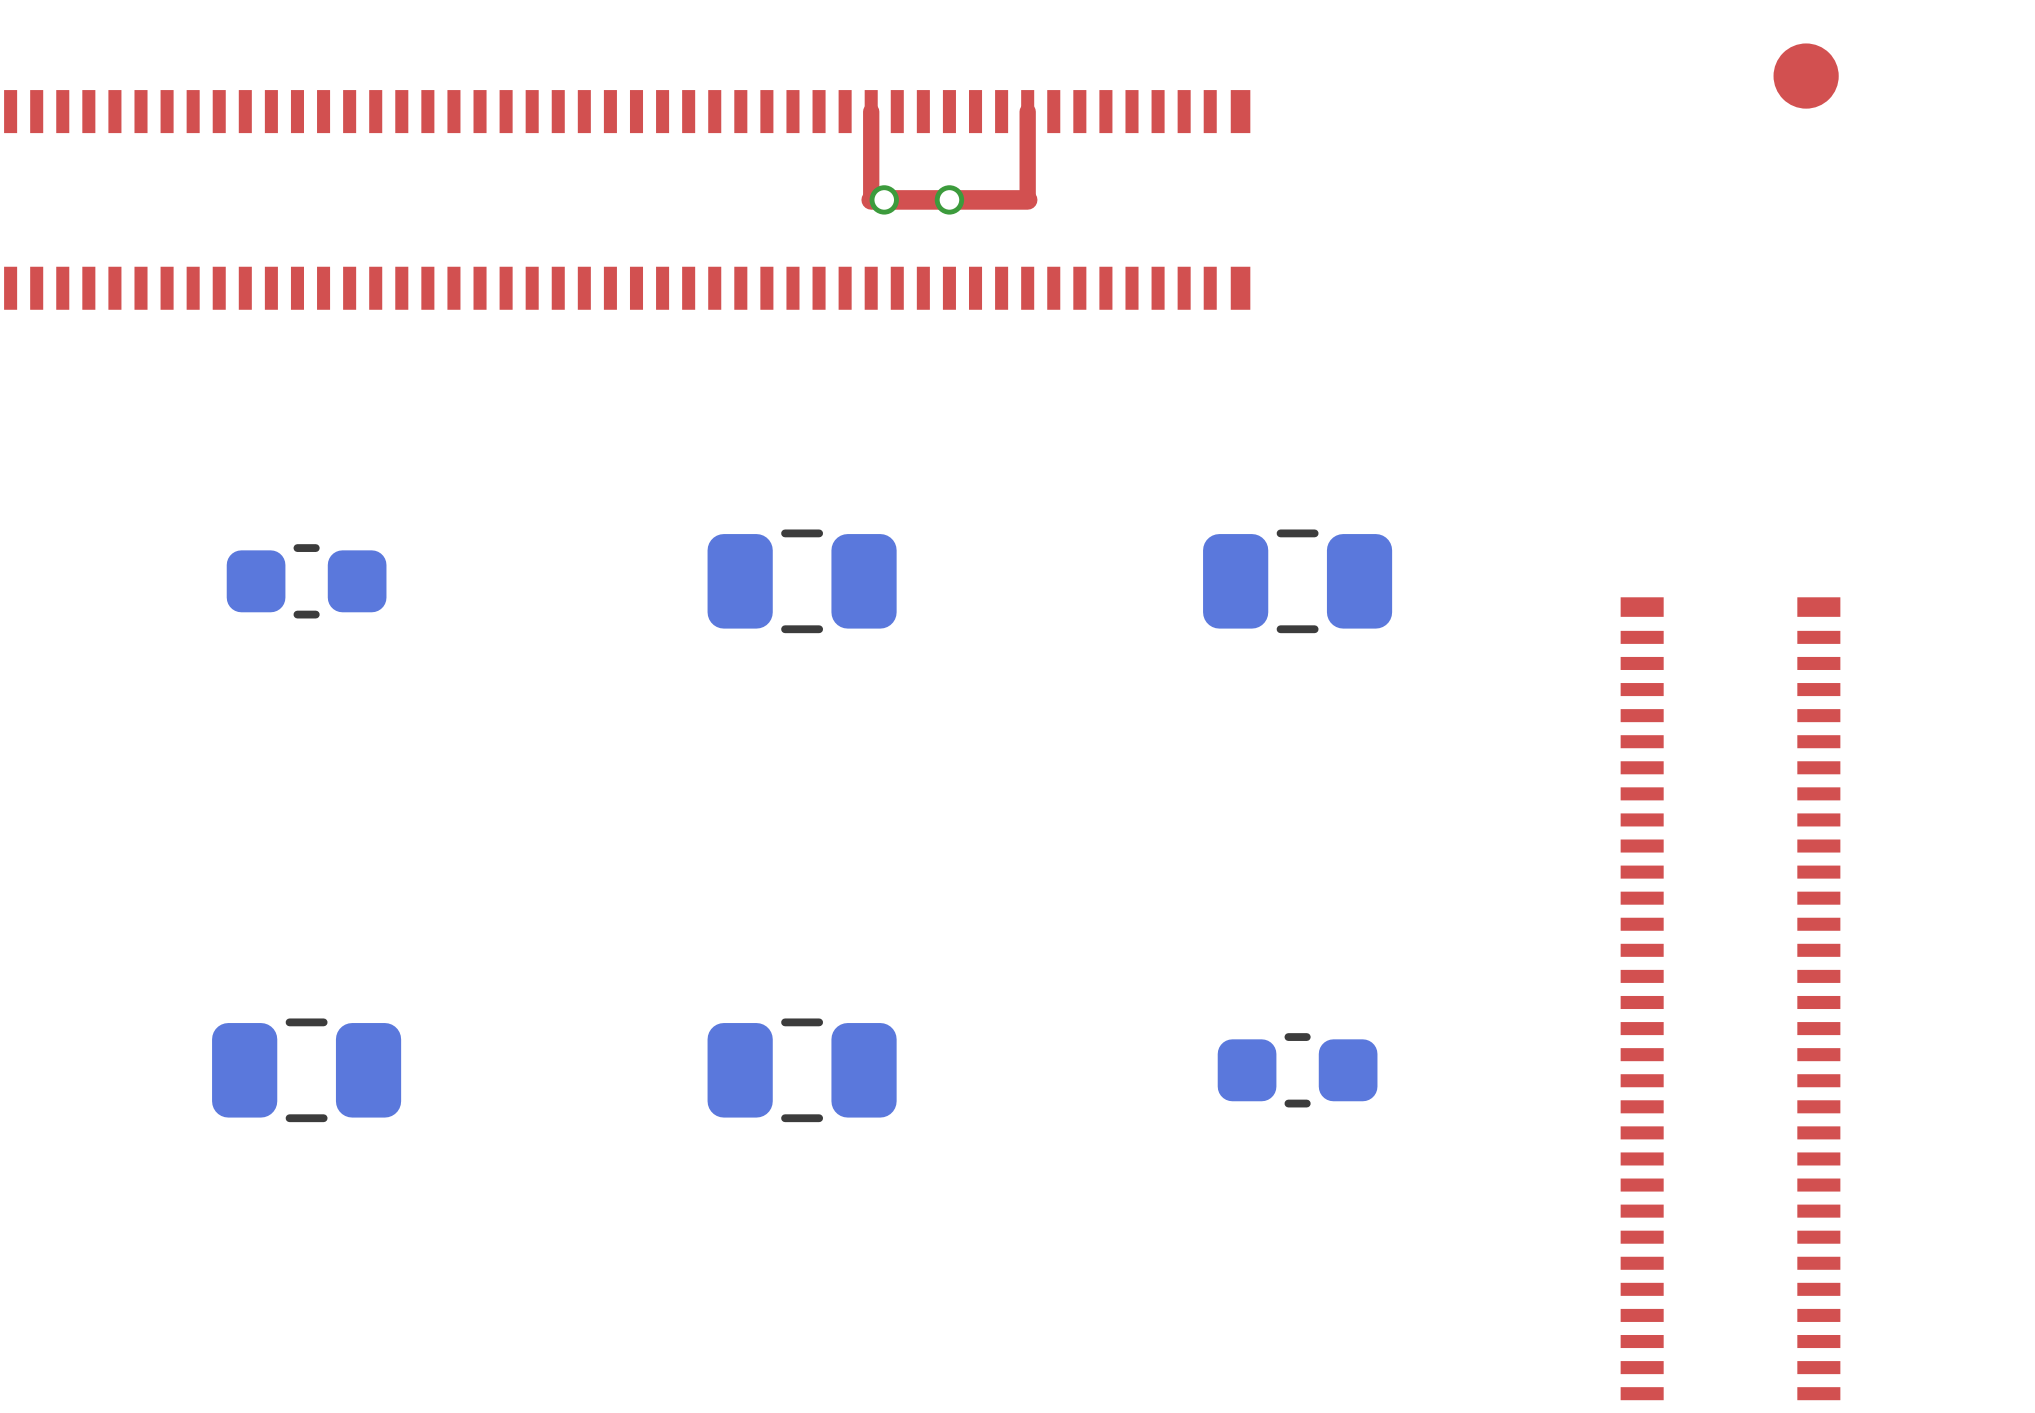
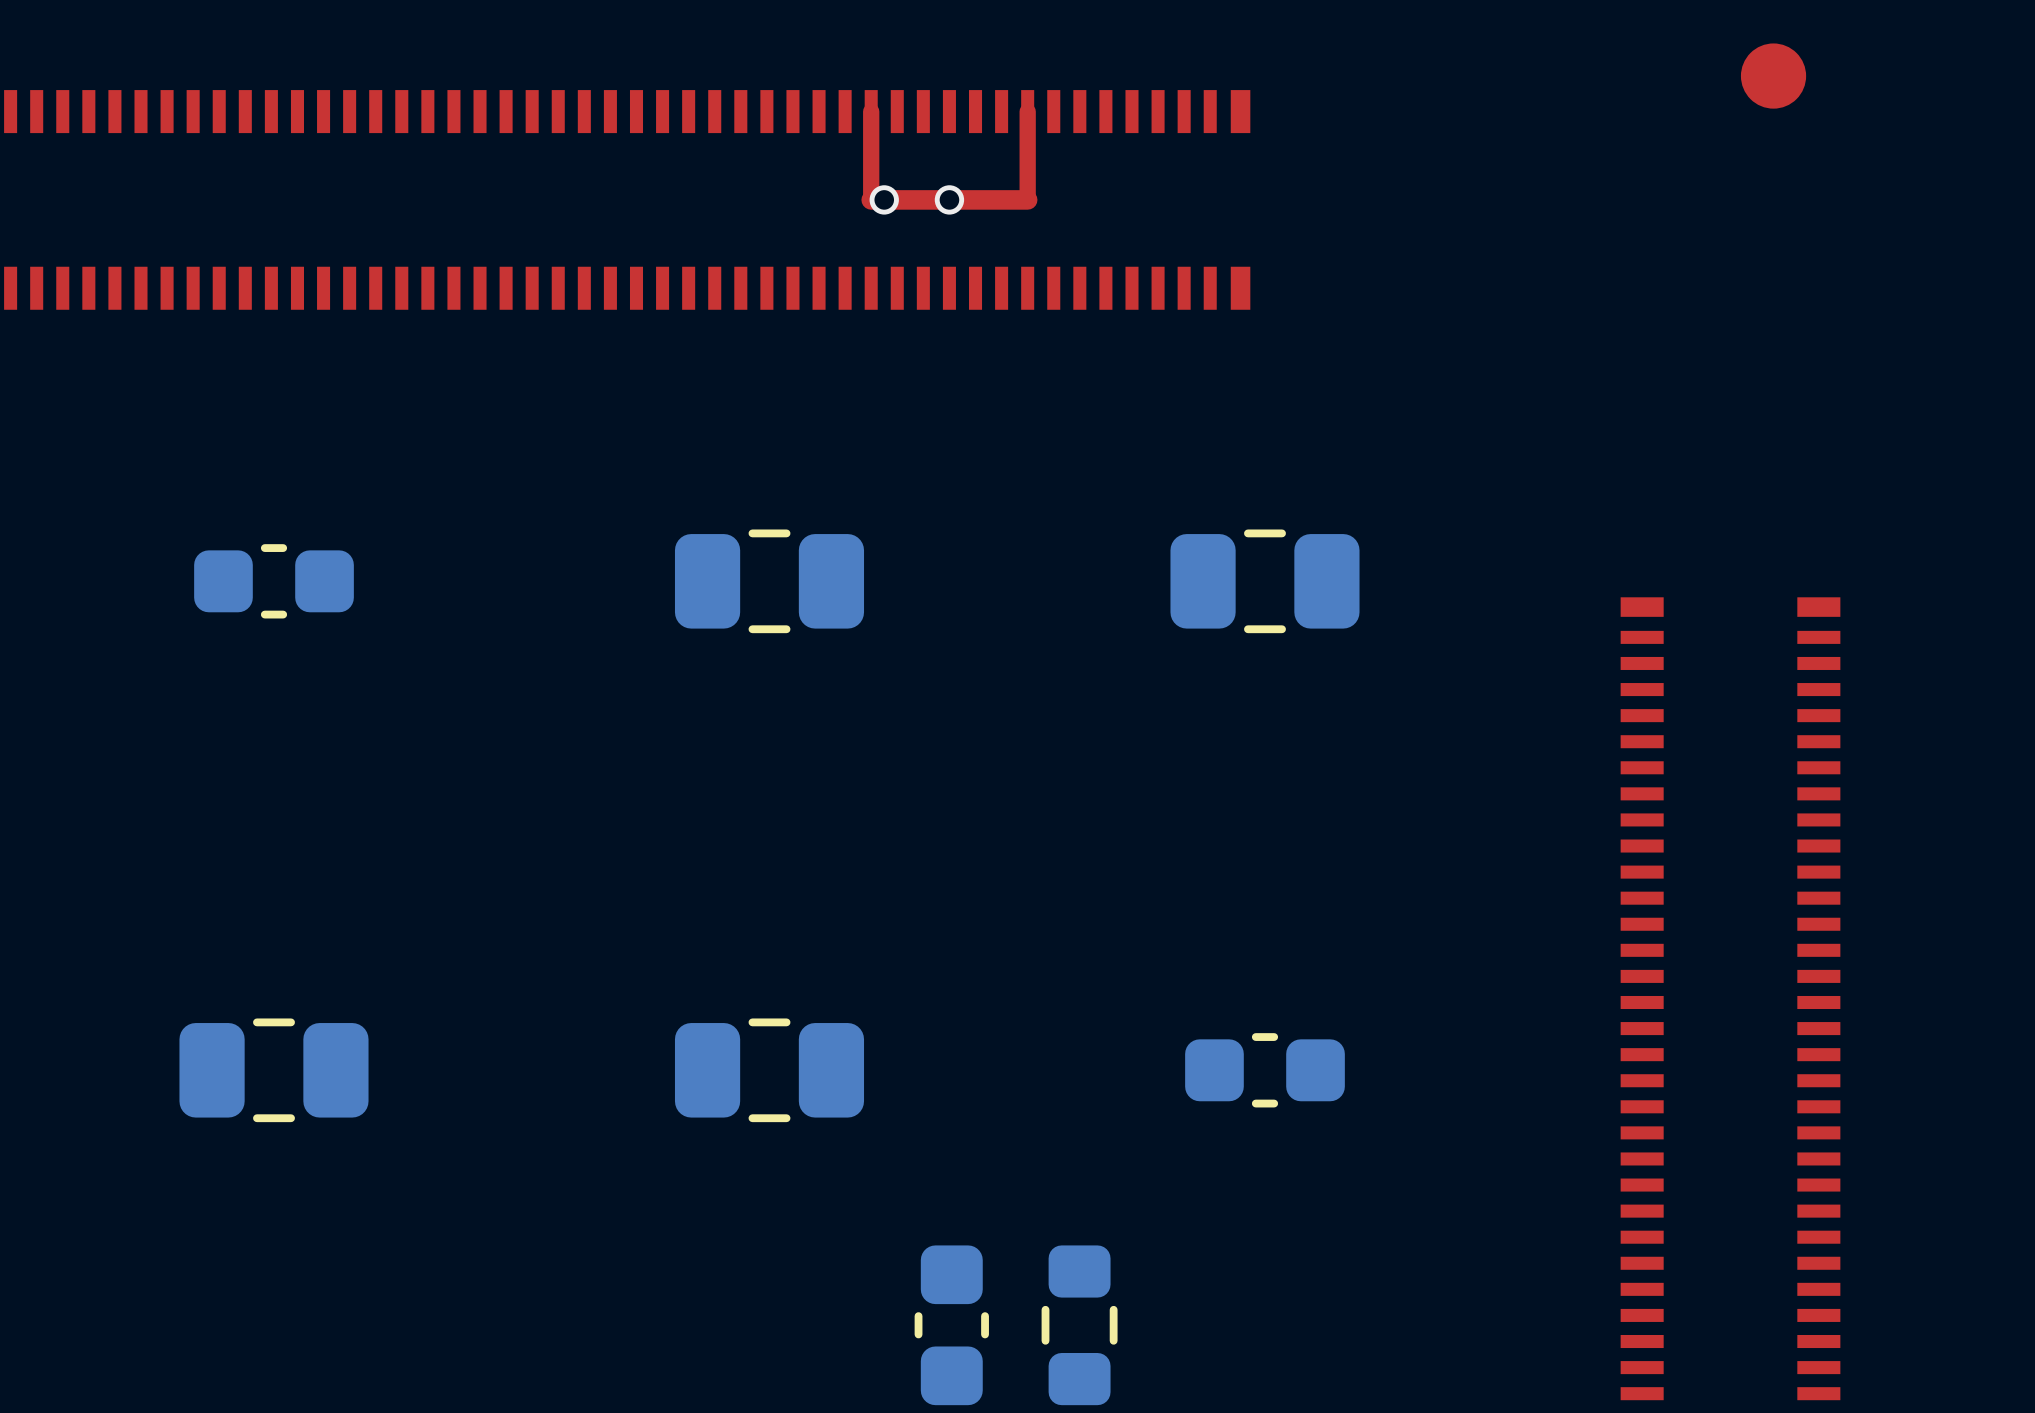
part position: (1806, 76) -> (1773, 76)
part position: (306, 581) -> (274, 581)
part position: (802, 581) -> (769, 581)
part position: (1297, 581) -> (1264, 581)
part position: (306, 1070) -> (274, 1070)
part position: (802, 1070) -> (769, 1070)
part position: (1297, 1070) -> (1264, 1070)
part: none -> (951, 1325)
part: none -> (1079, 1325)

